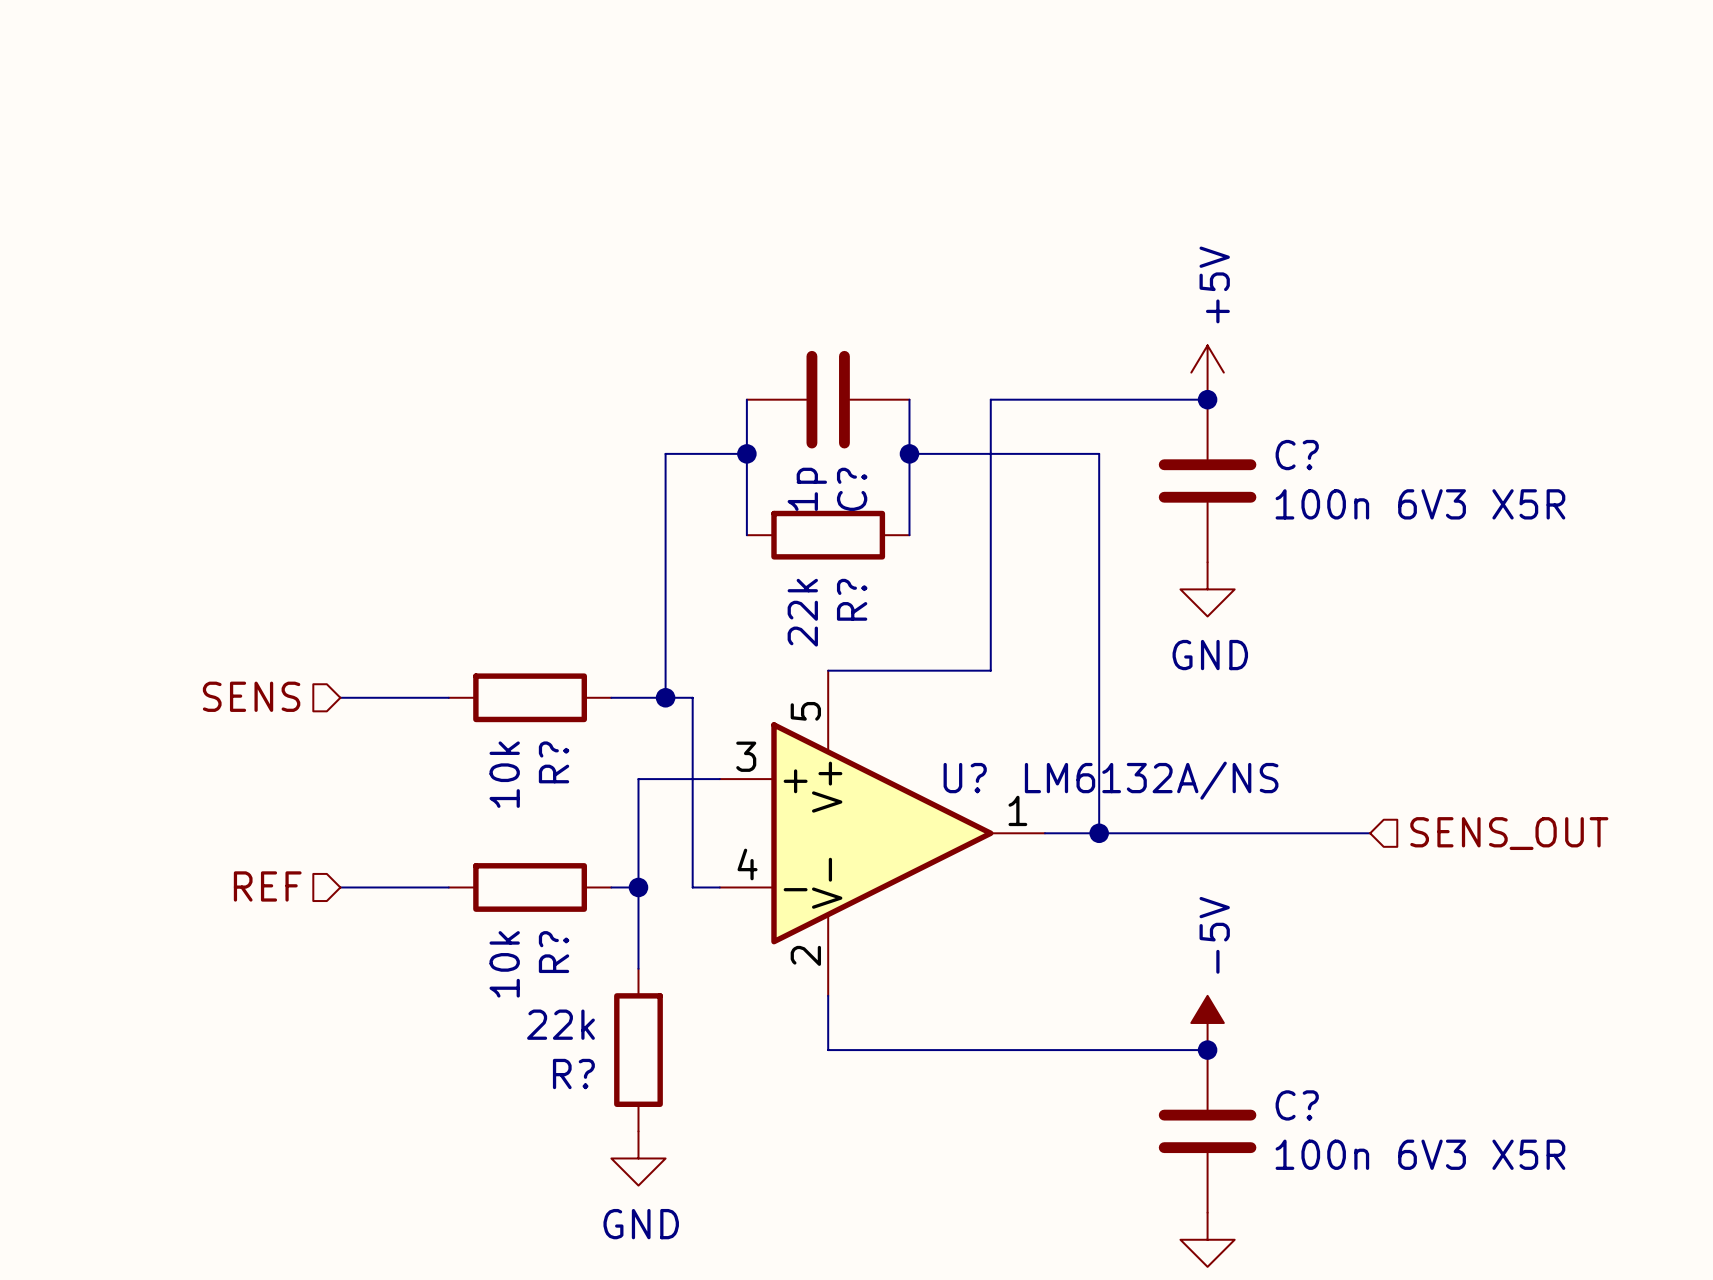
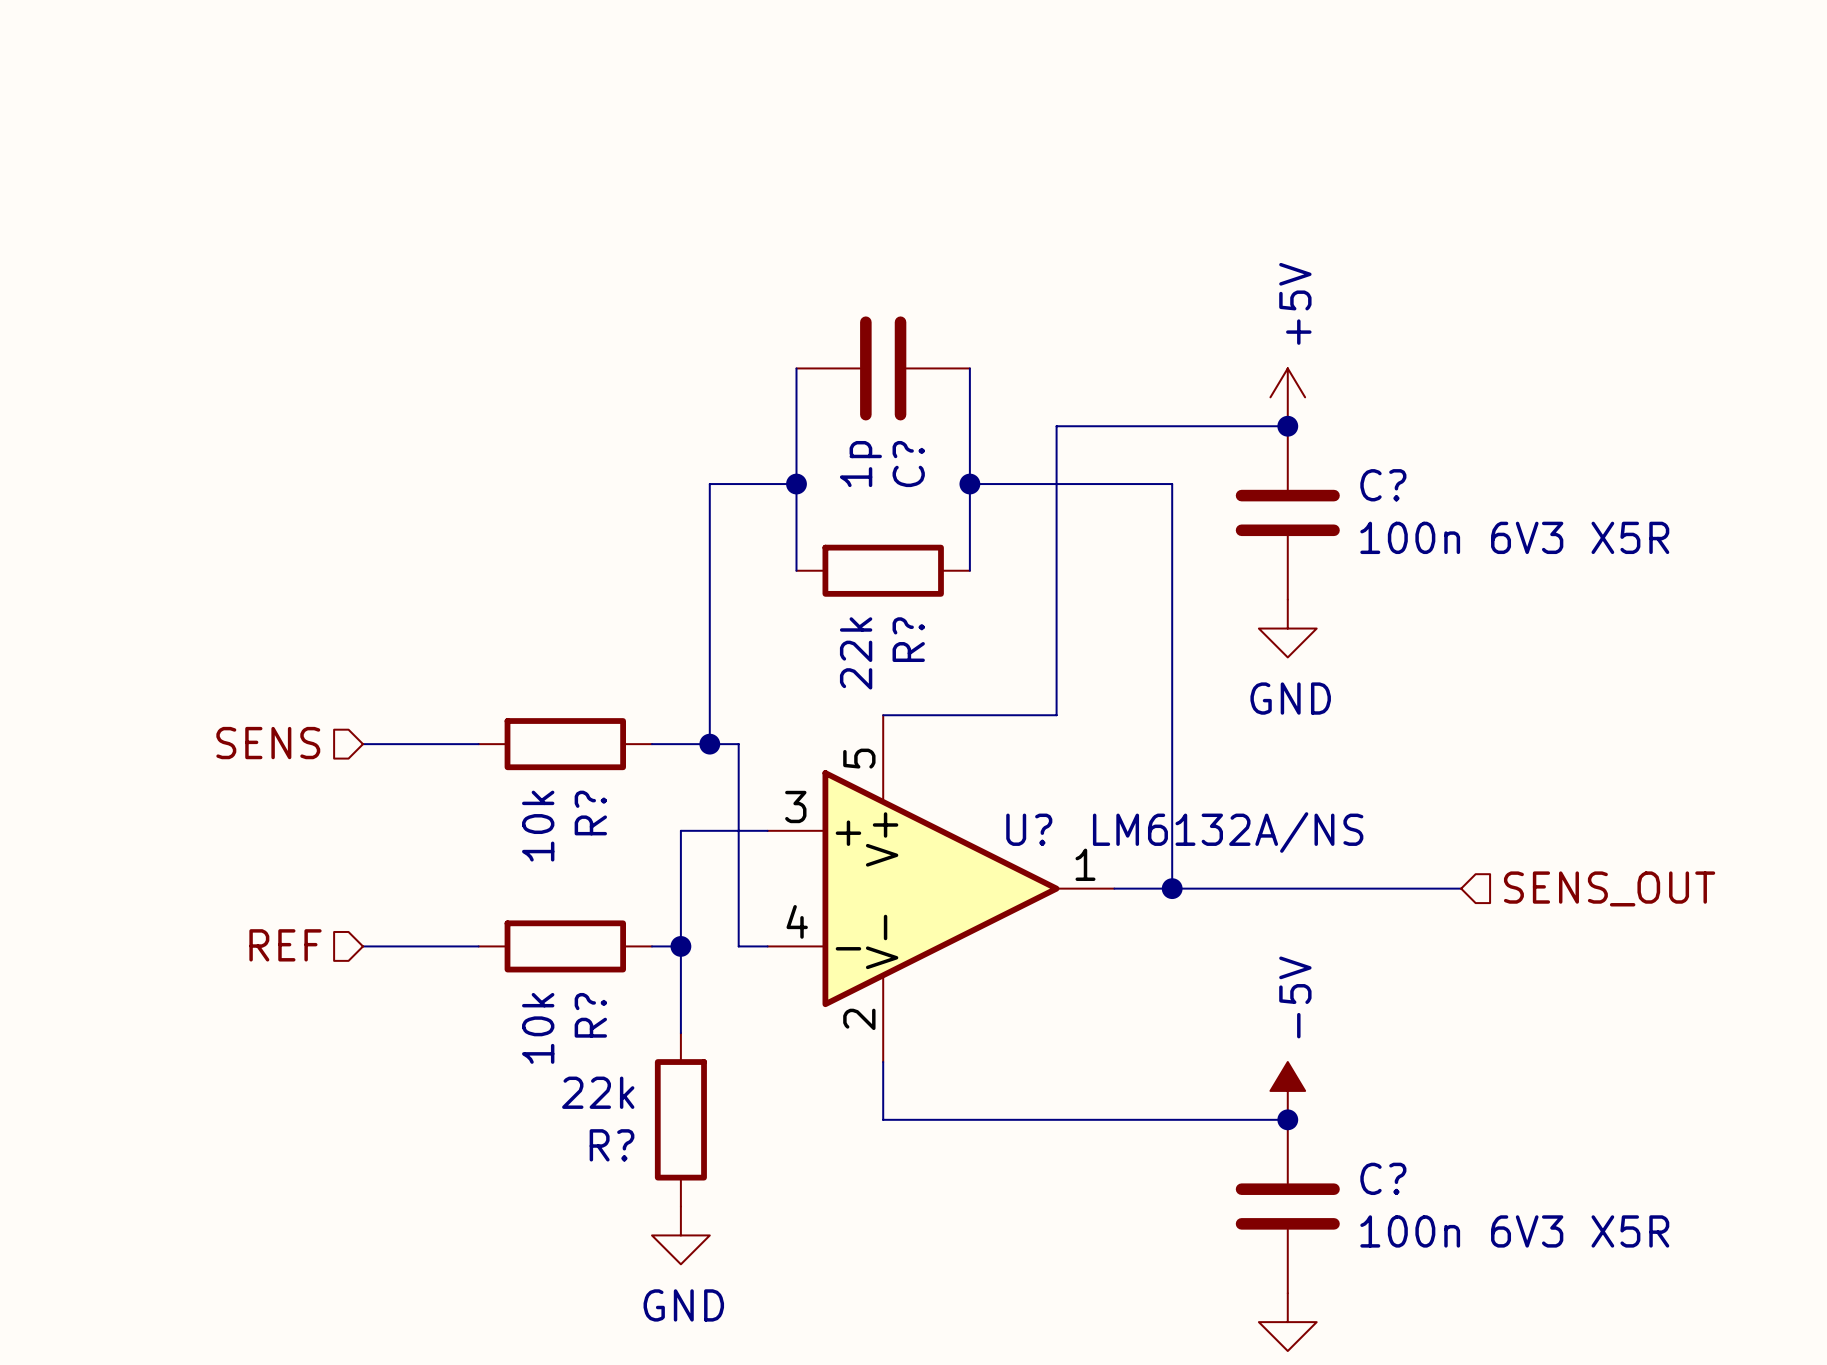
wire: none -> (796, 368) (796, 426)
wire: none -> (969, 368) (969, 426)
C? position: (828, 399) -> (883, 368)

